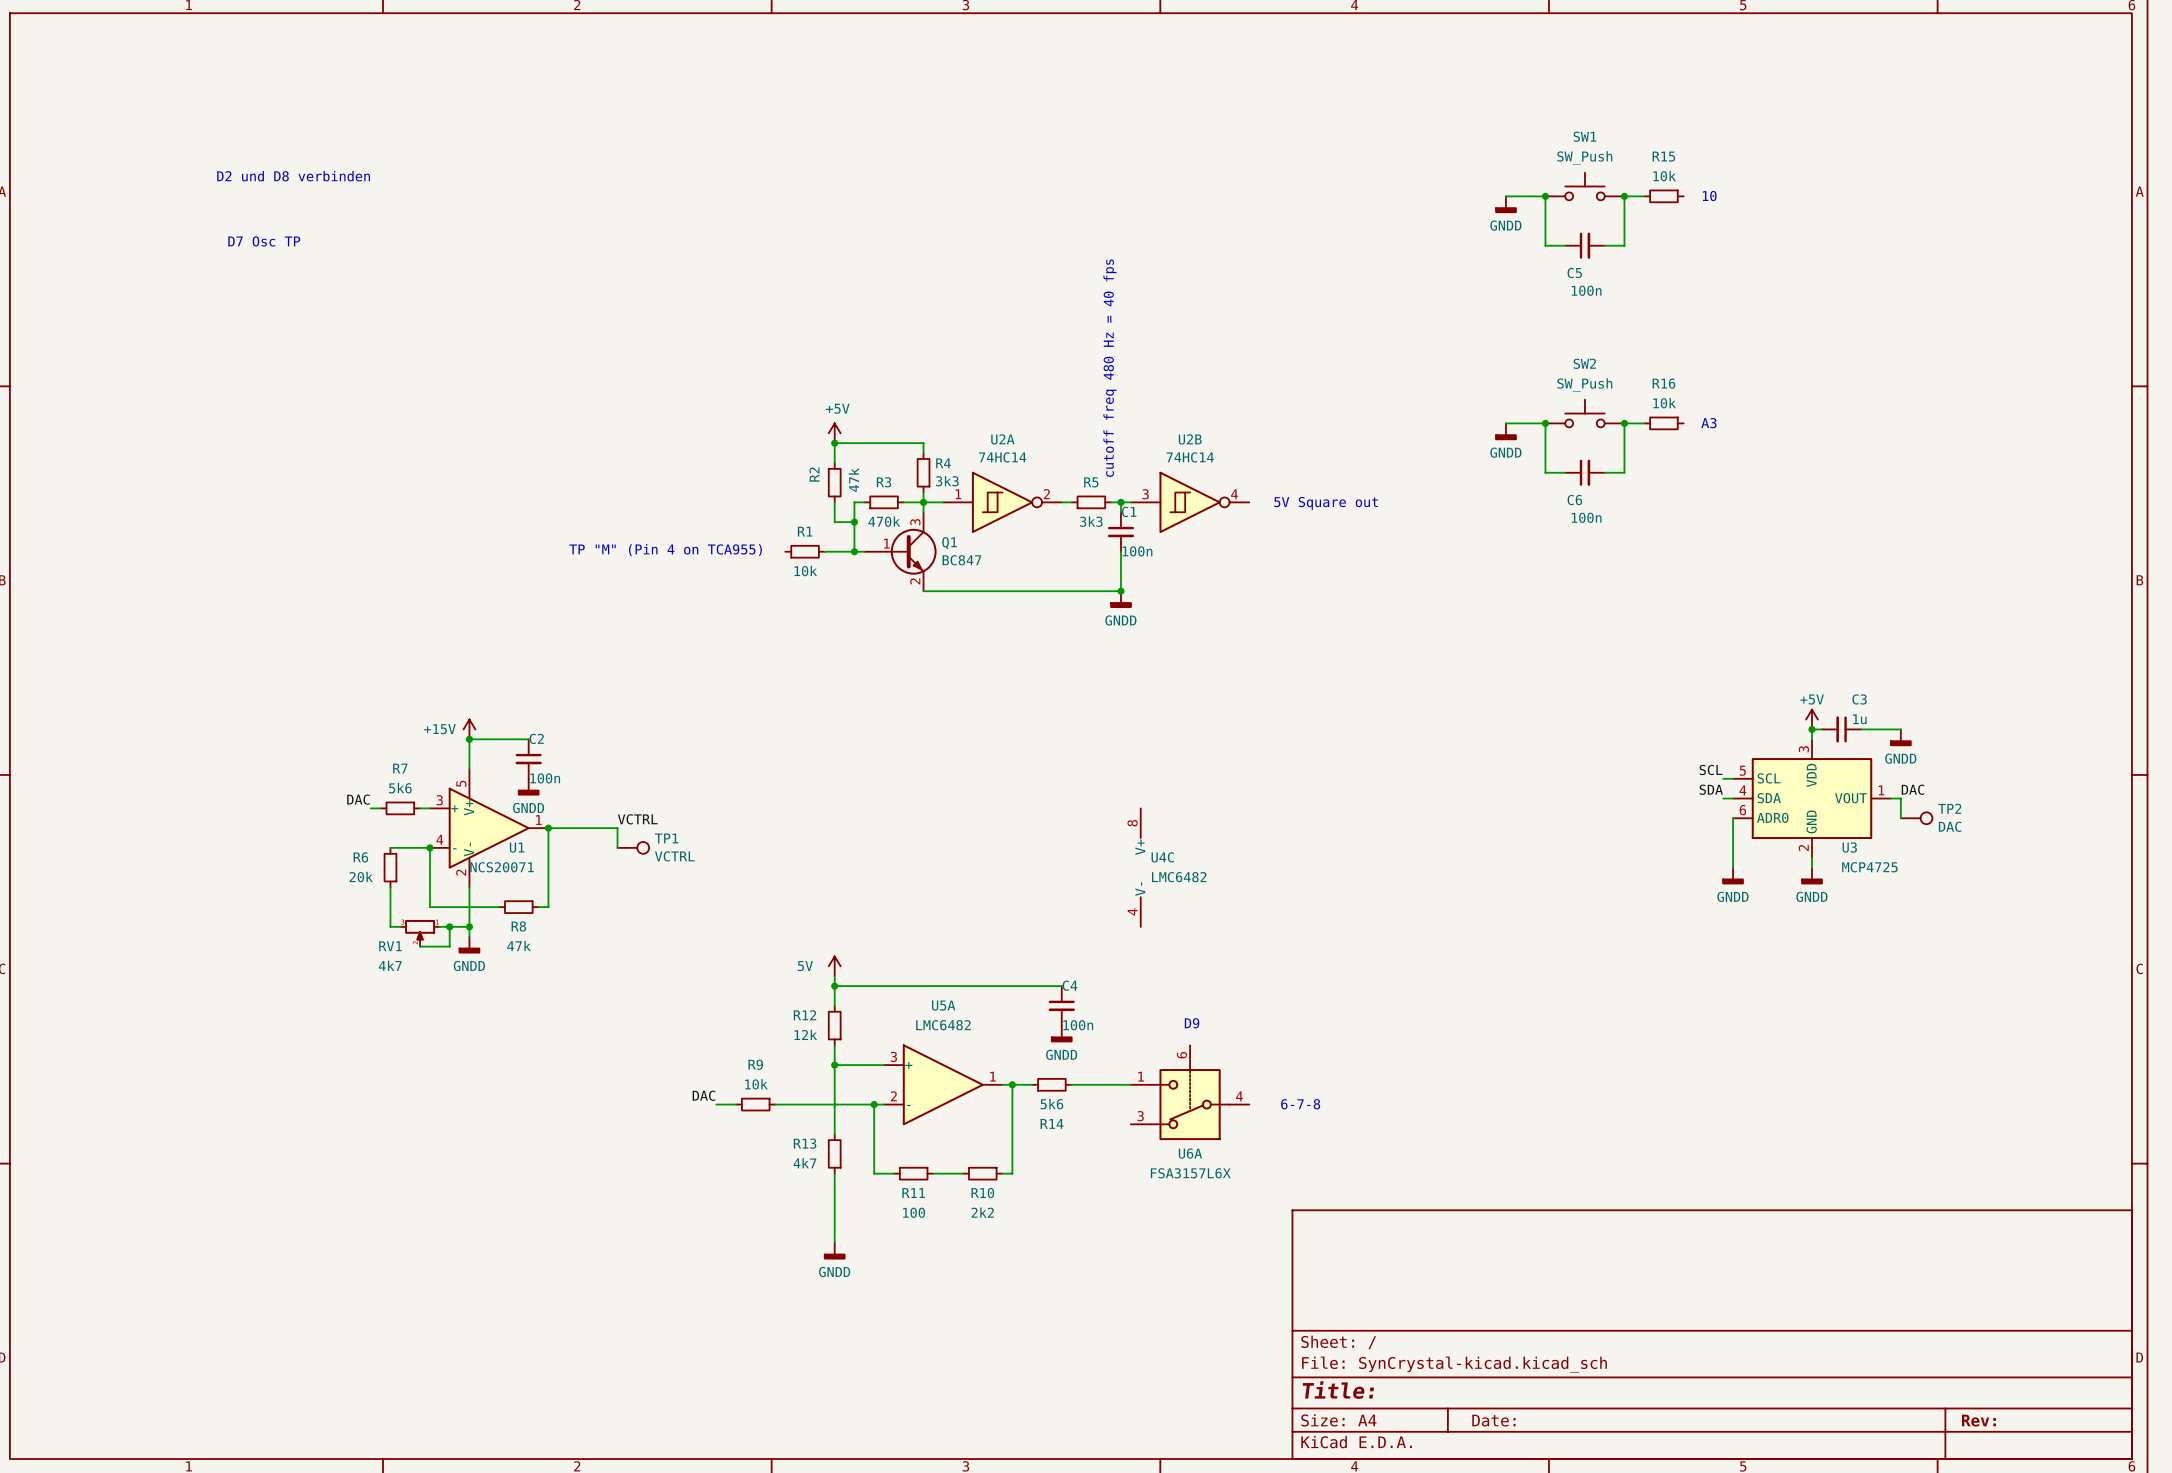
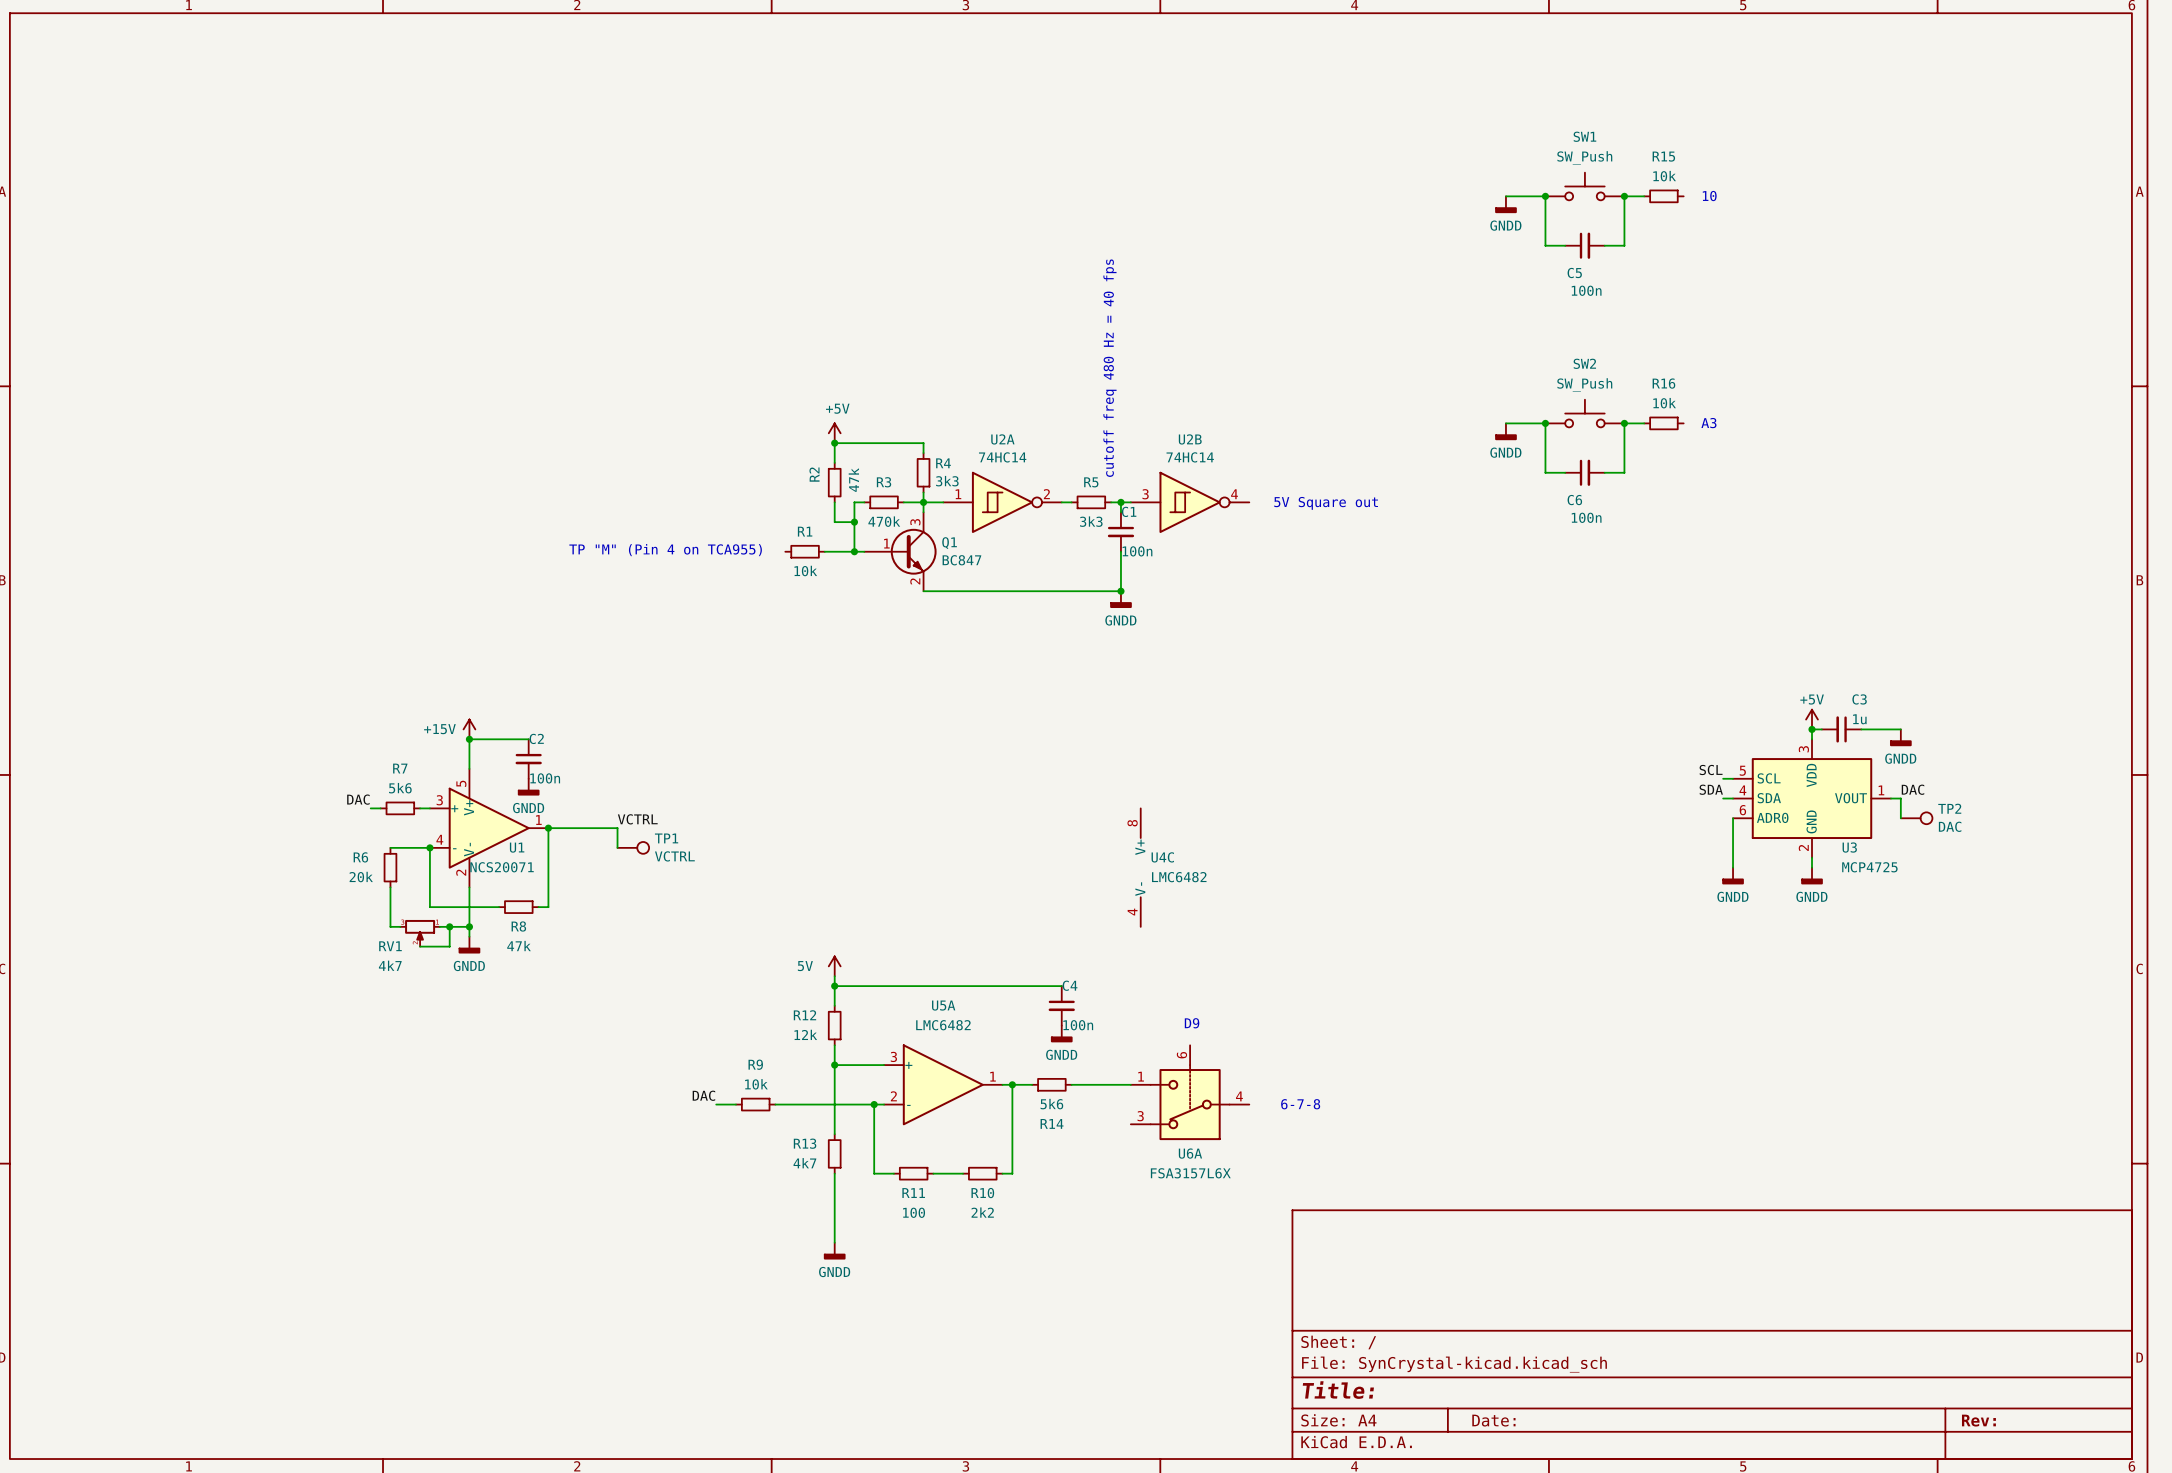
text: D2 und D8 verbinden (293, 176) -> none
text: D7 Osc TP (264, 241) -> none

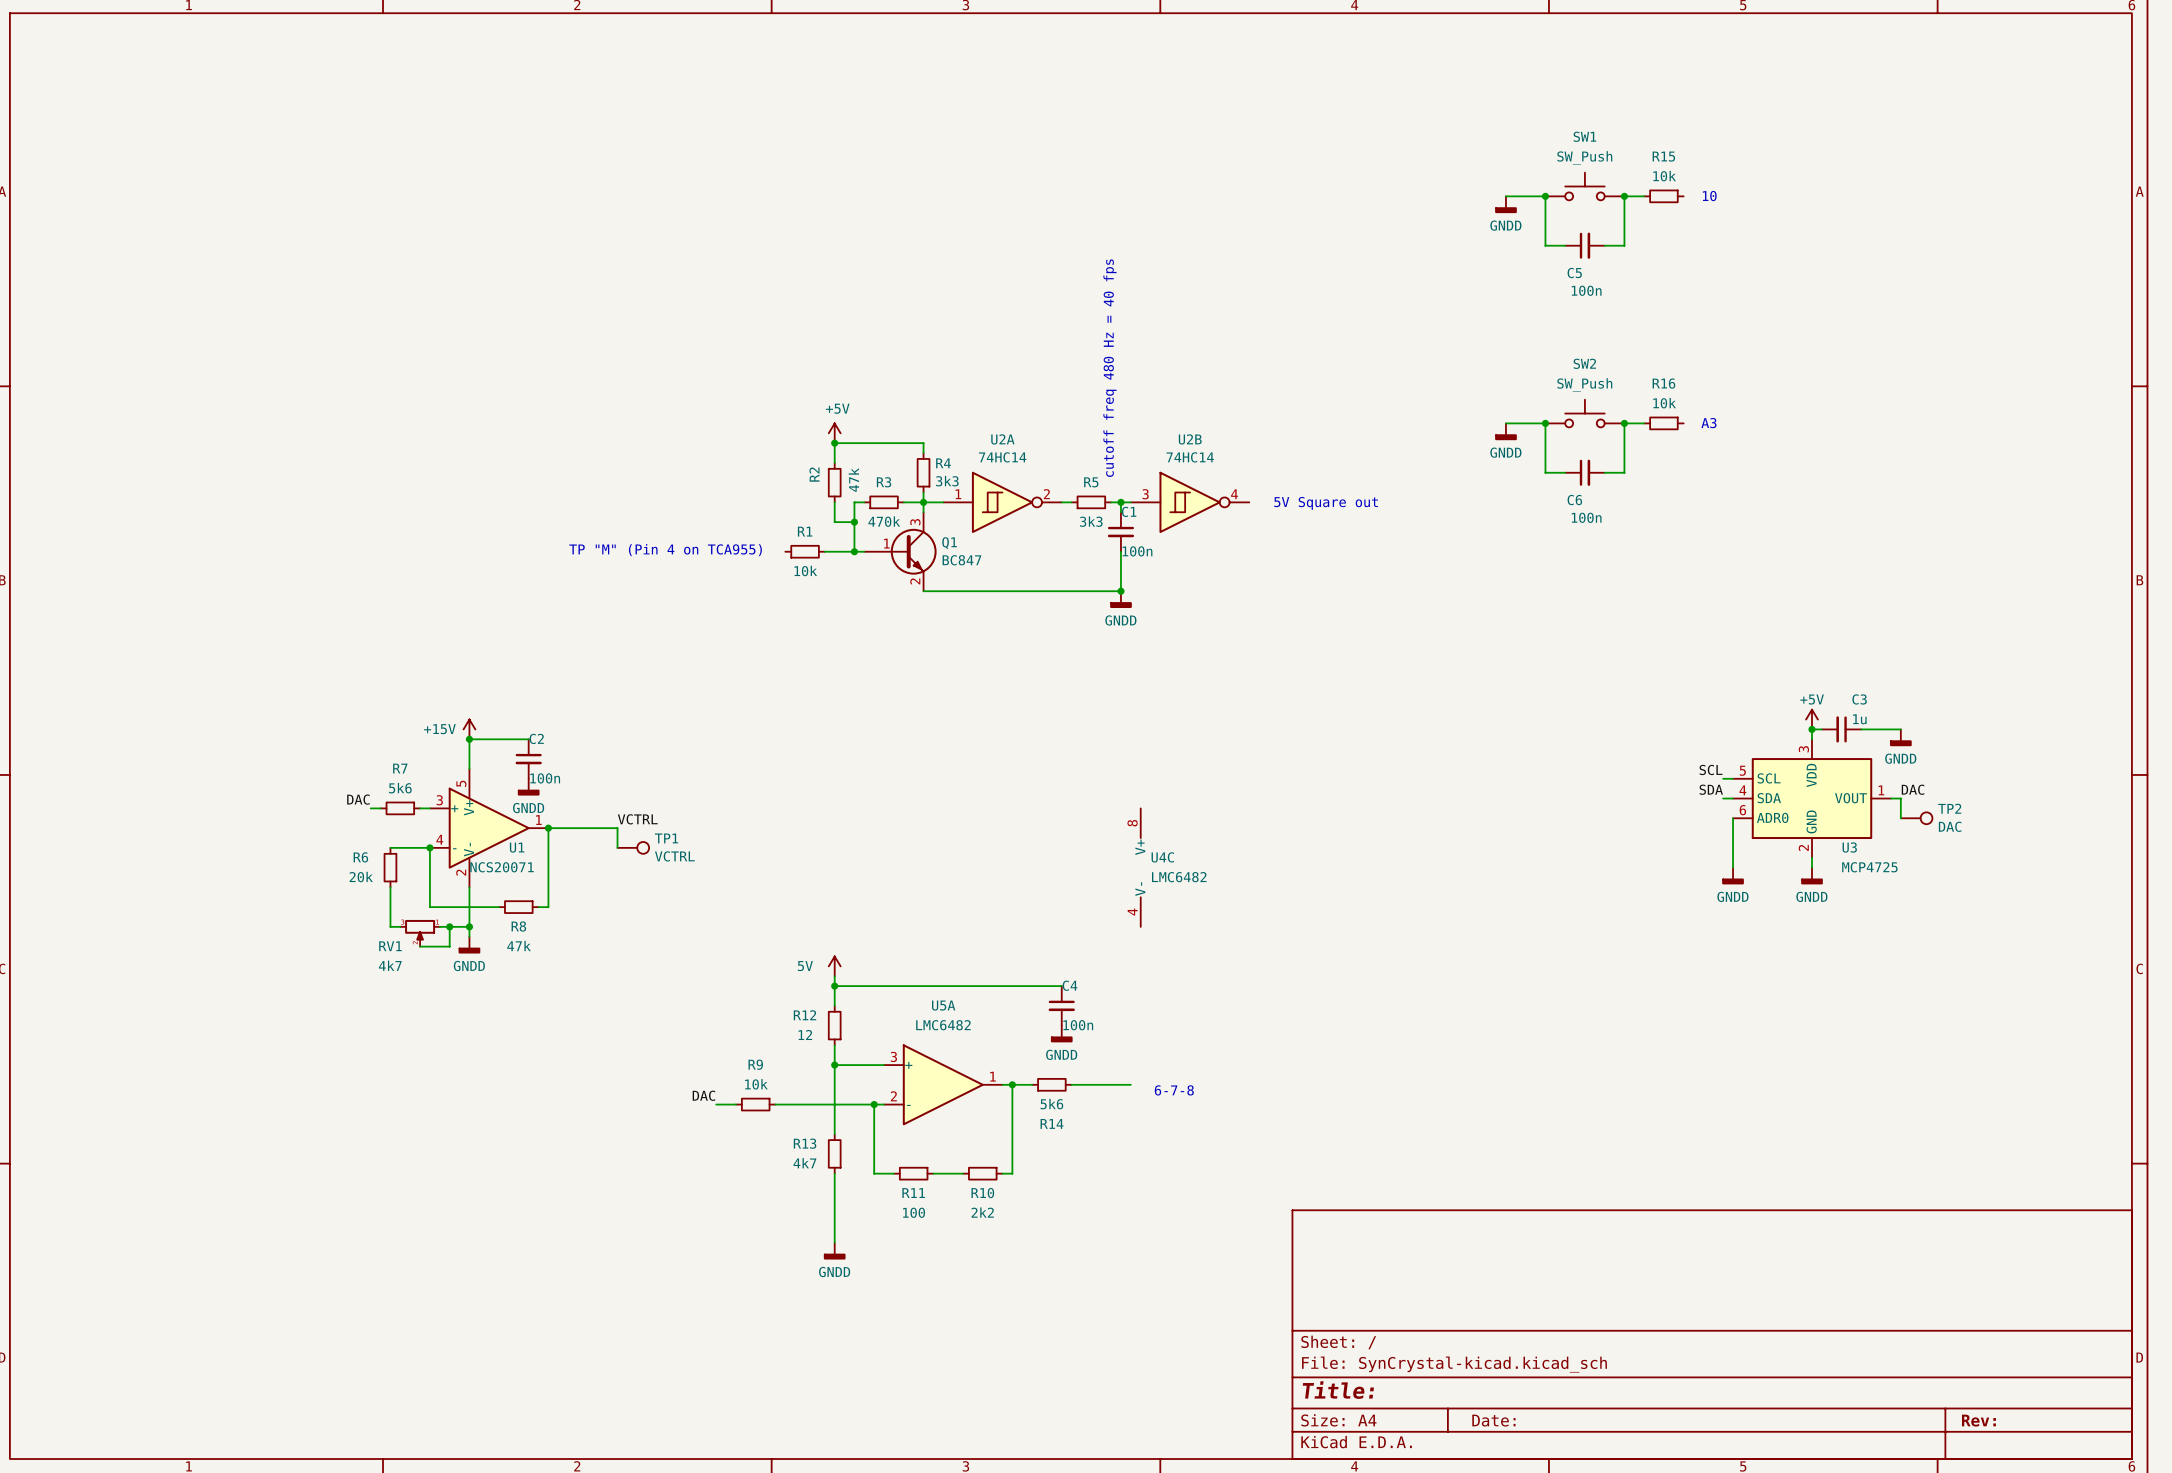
text: D9 (1192, 1023) -> none
R12 value: 12k (805, 1034) -> 12 (805, 1035)
U6A: FSA3157L6X (1190, 1092) -> none
text position: 6-7-8 (1300, 1104) -> 6-7-8 (1174, 1090)

